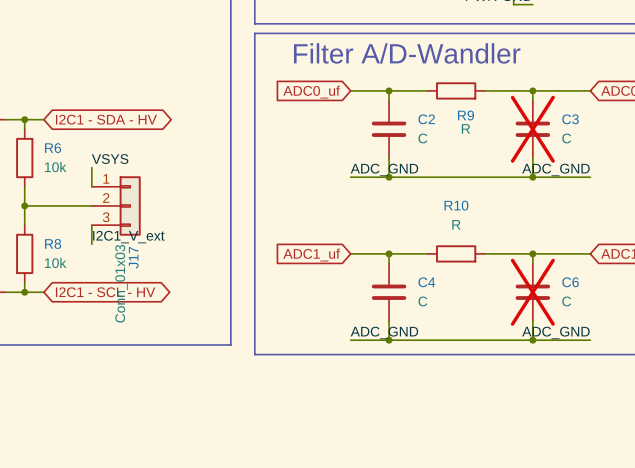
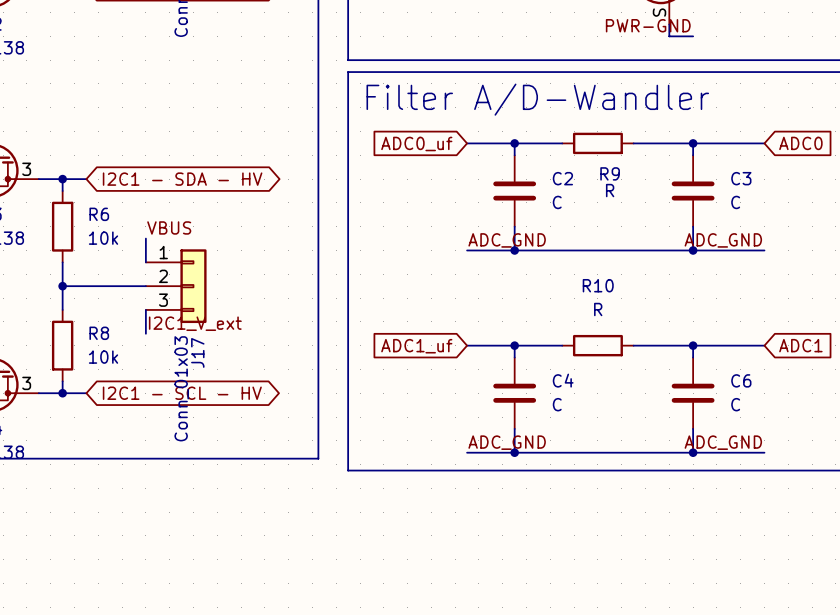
C3 do-not-place cross: (532, 129) -> none
label: VSYS (110, 159) -> VBUS (169, 227)
C6 do-not-place cross: (532, 292) -> none

